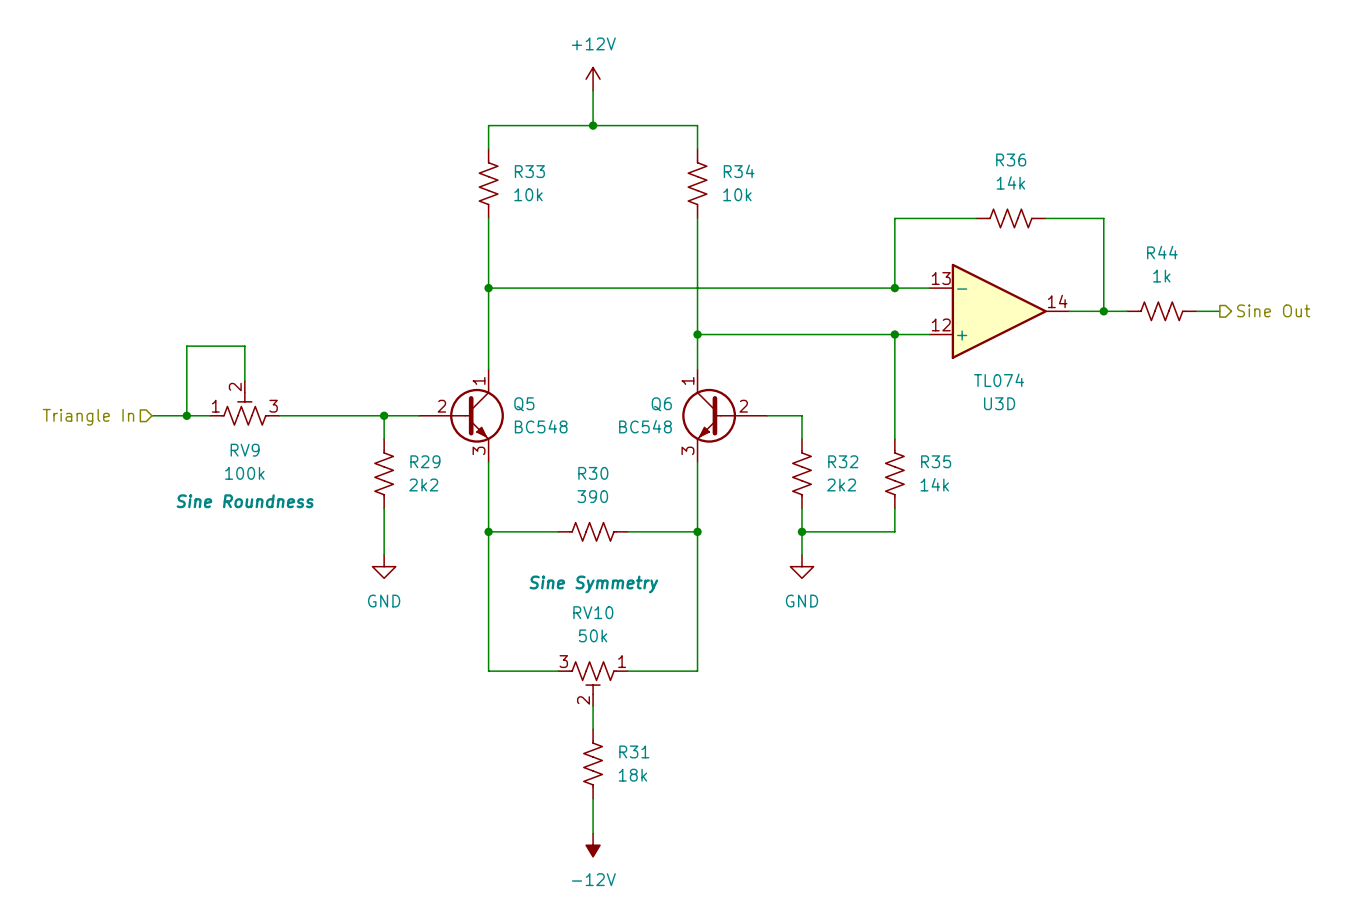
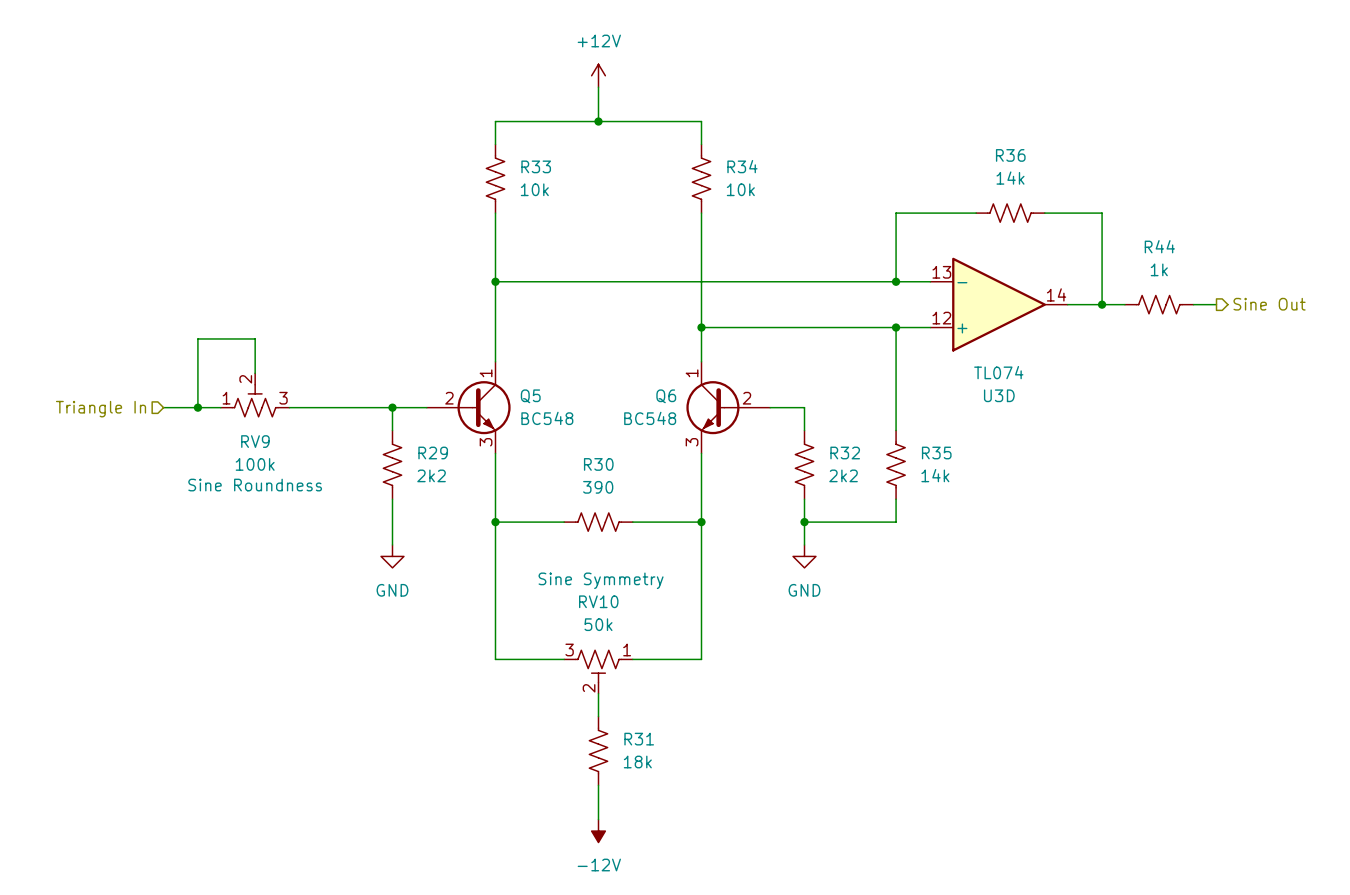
RV9 text: none -> Sine Roundness (255, 485)
RV9 text: Sine Roundness (245, 501) -> none
RV10 text: Sine Symmetry (593, 584) -> none
RV10 text: none -> Sine Symmetry (601, 580)

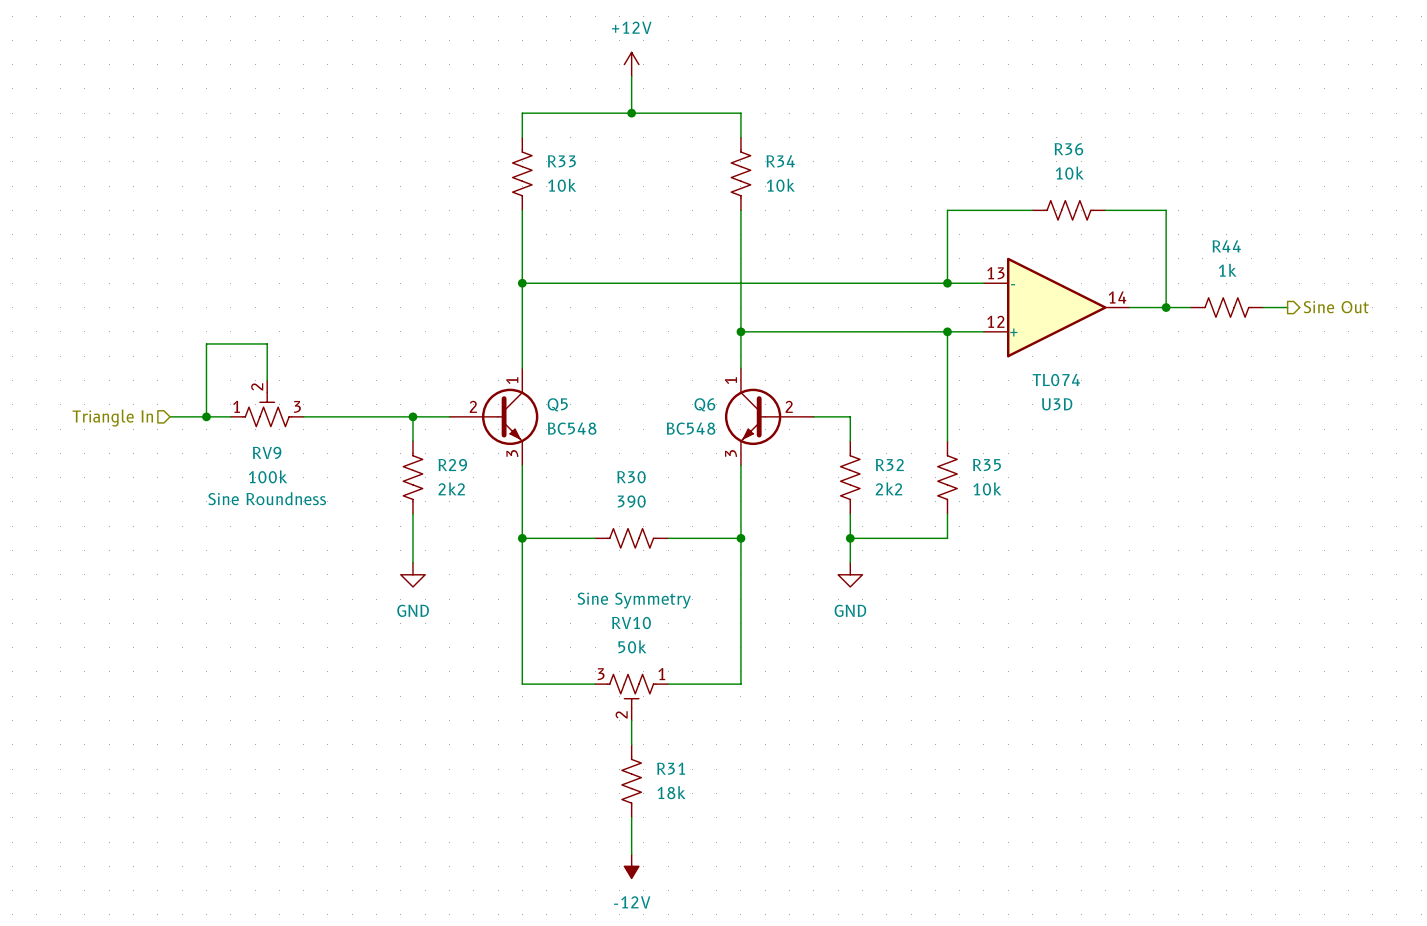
R36 value: 14k (1010, 178) -> 10k (1069, 173)
R35 value: 14k (935, 475) -> 10k (987, 488)

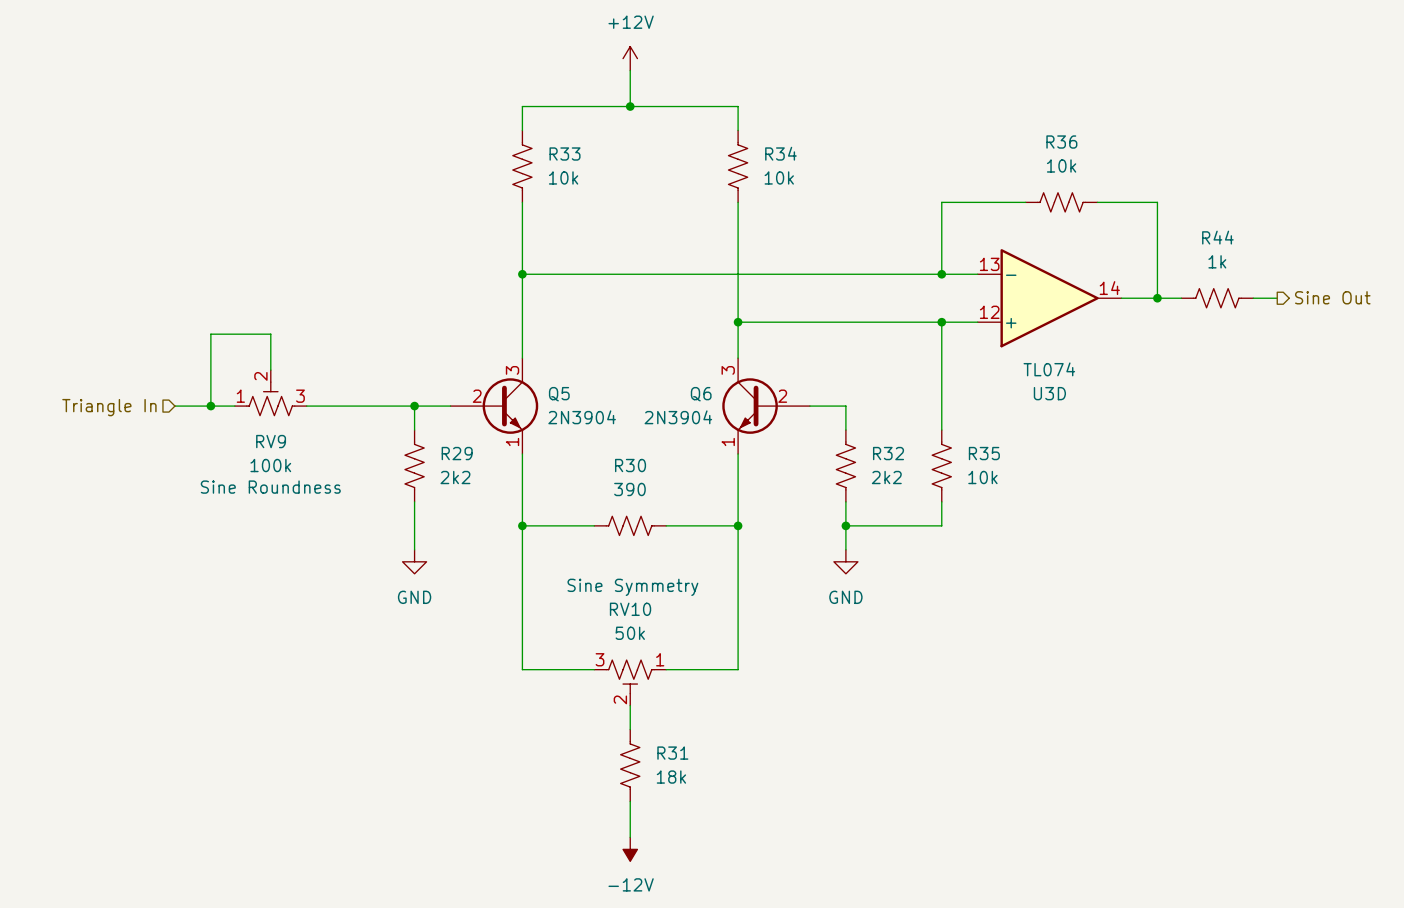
Q5 symbol: [449, 368, 539, 466] -> [450, 358, 539, 454]
Q6 symbol: [724, 368, 814, 466] -> [722, 358, 810, 454]
Q5 value: BC548 (572, 428) -> 2N3904 (582, 417)
Q6 value: BC548 (691, 428) -> 2N3904 (678, 417)

